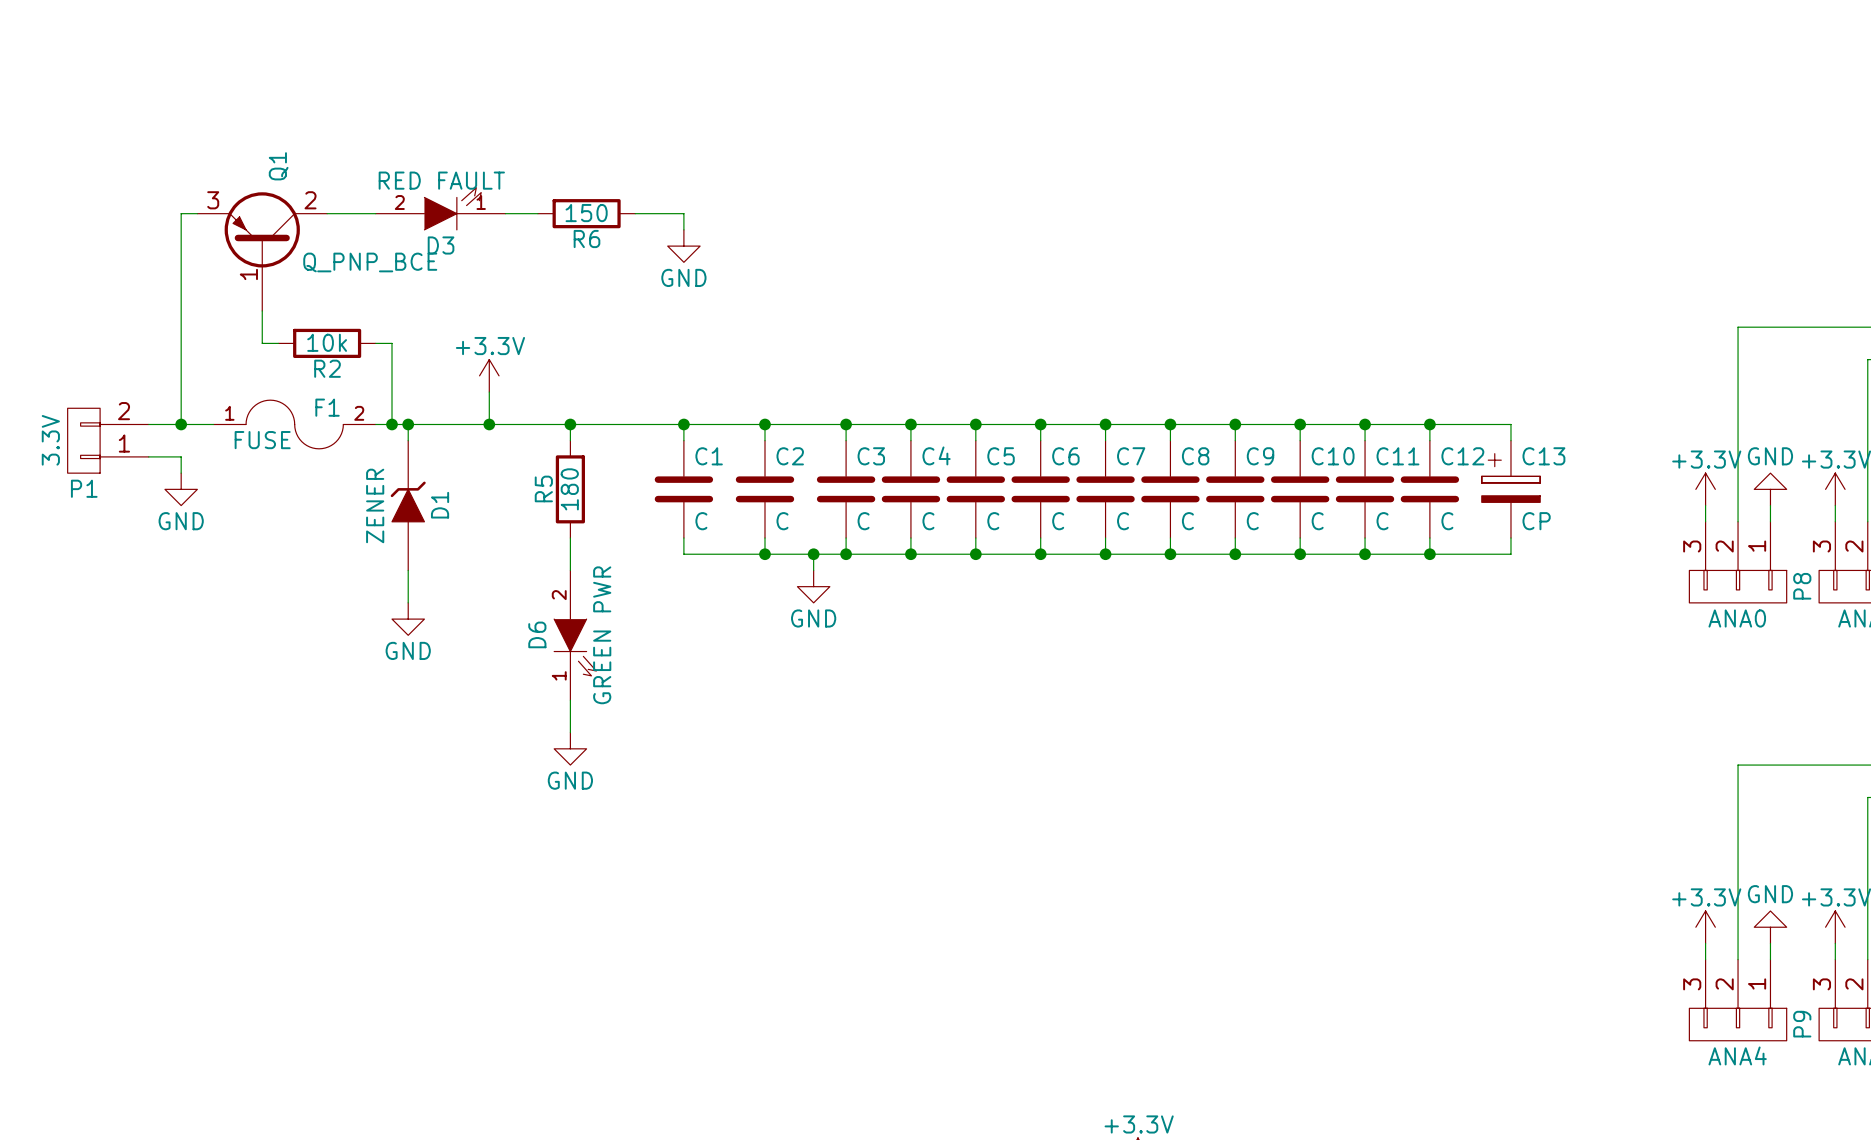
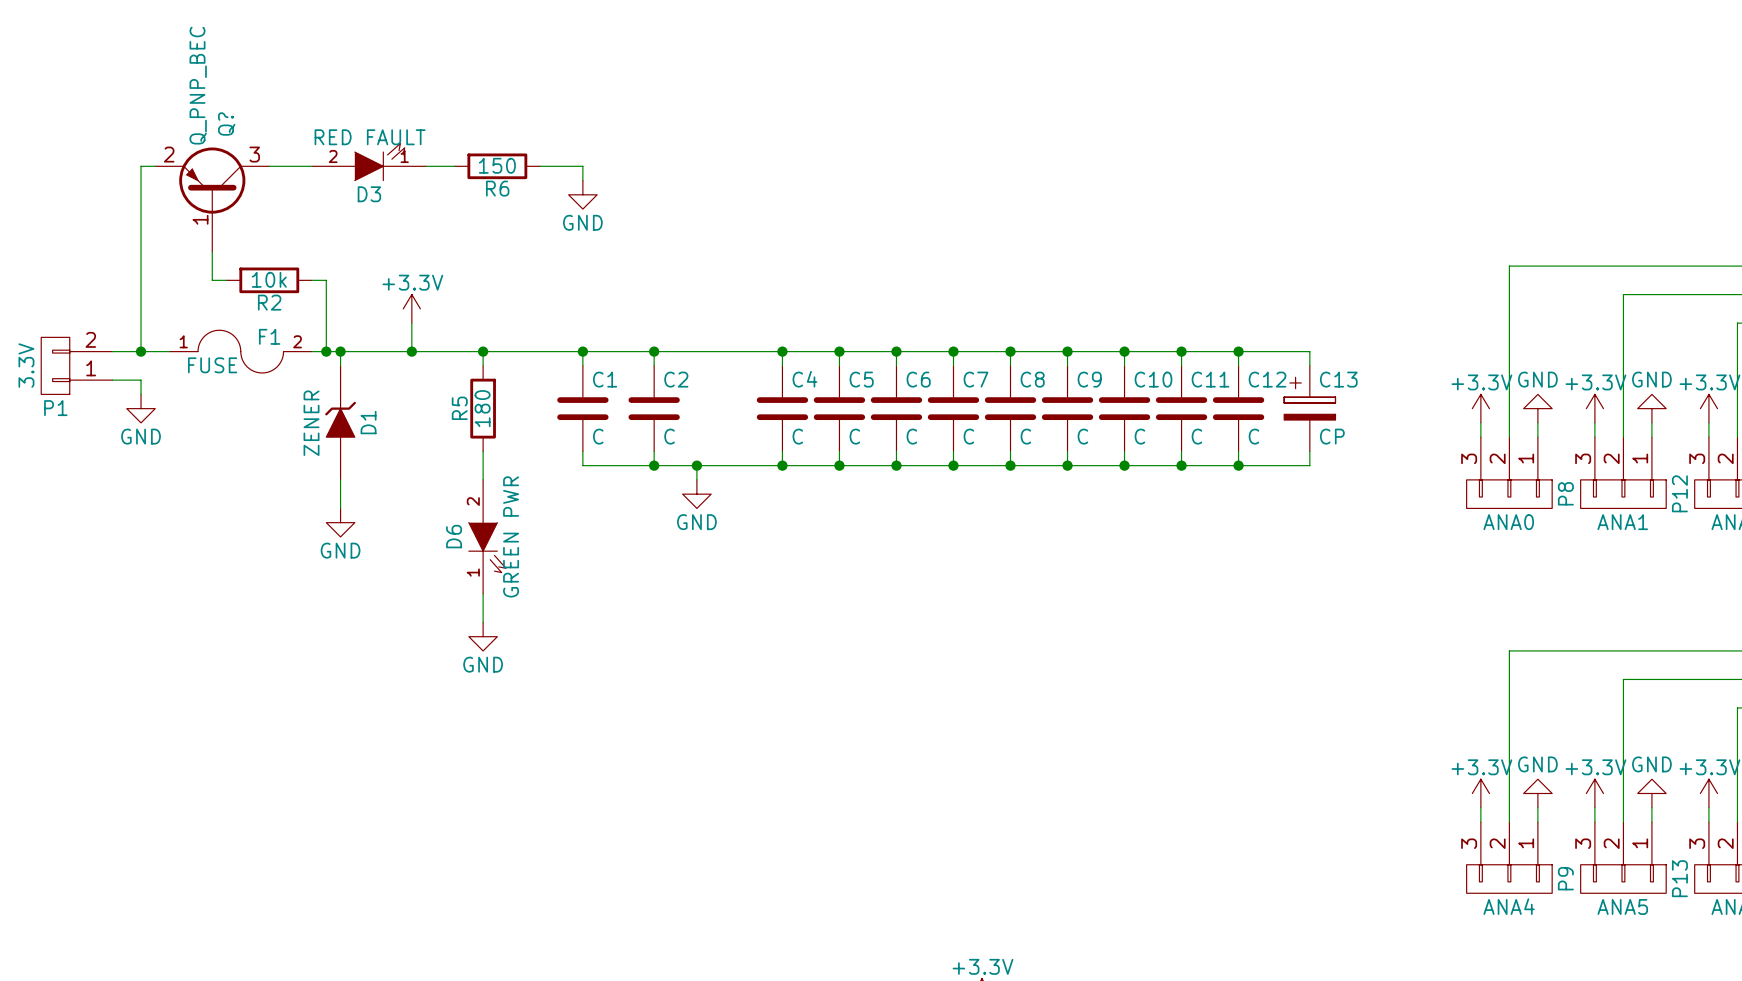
Q1 name: Q1 (278, 166) -> Q? (226, 124)
Q1 pin number: 3 (213, 200) -> 2 (169, 154)
Q1 pin number: 2 (310, 200) -> 3 (254, 154)
Q1 value: Q_PNP_BCE (370, 262) -> Q_PNP_BEC (198, 85)
wire: (846, 424) (846, 440) -> none
junction: (846, 424) -> none
C3: C (846, 489) -> none
wire: (846, 538) (846, 554) -> none
junction: (846, 554) -> none

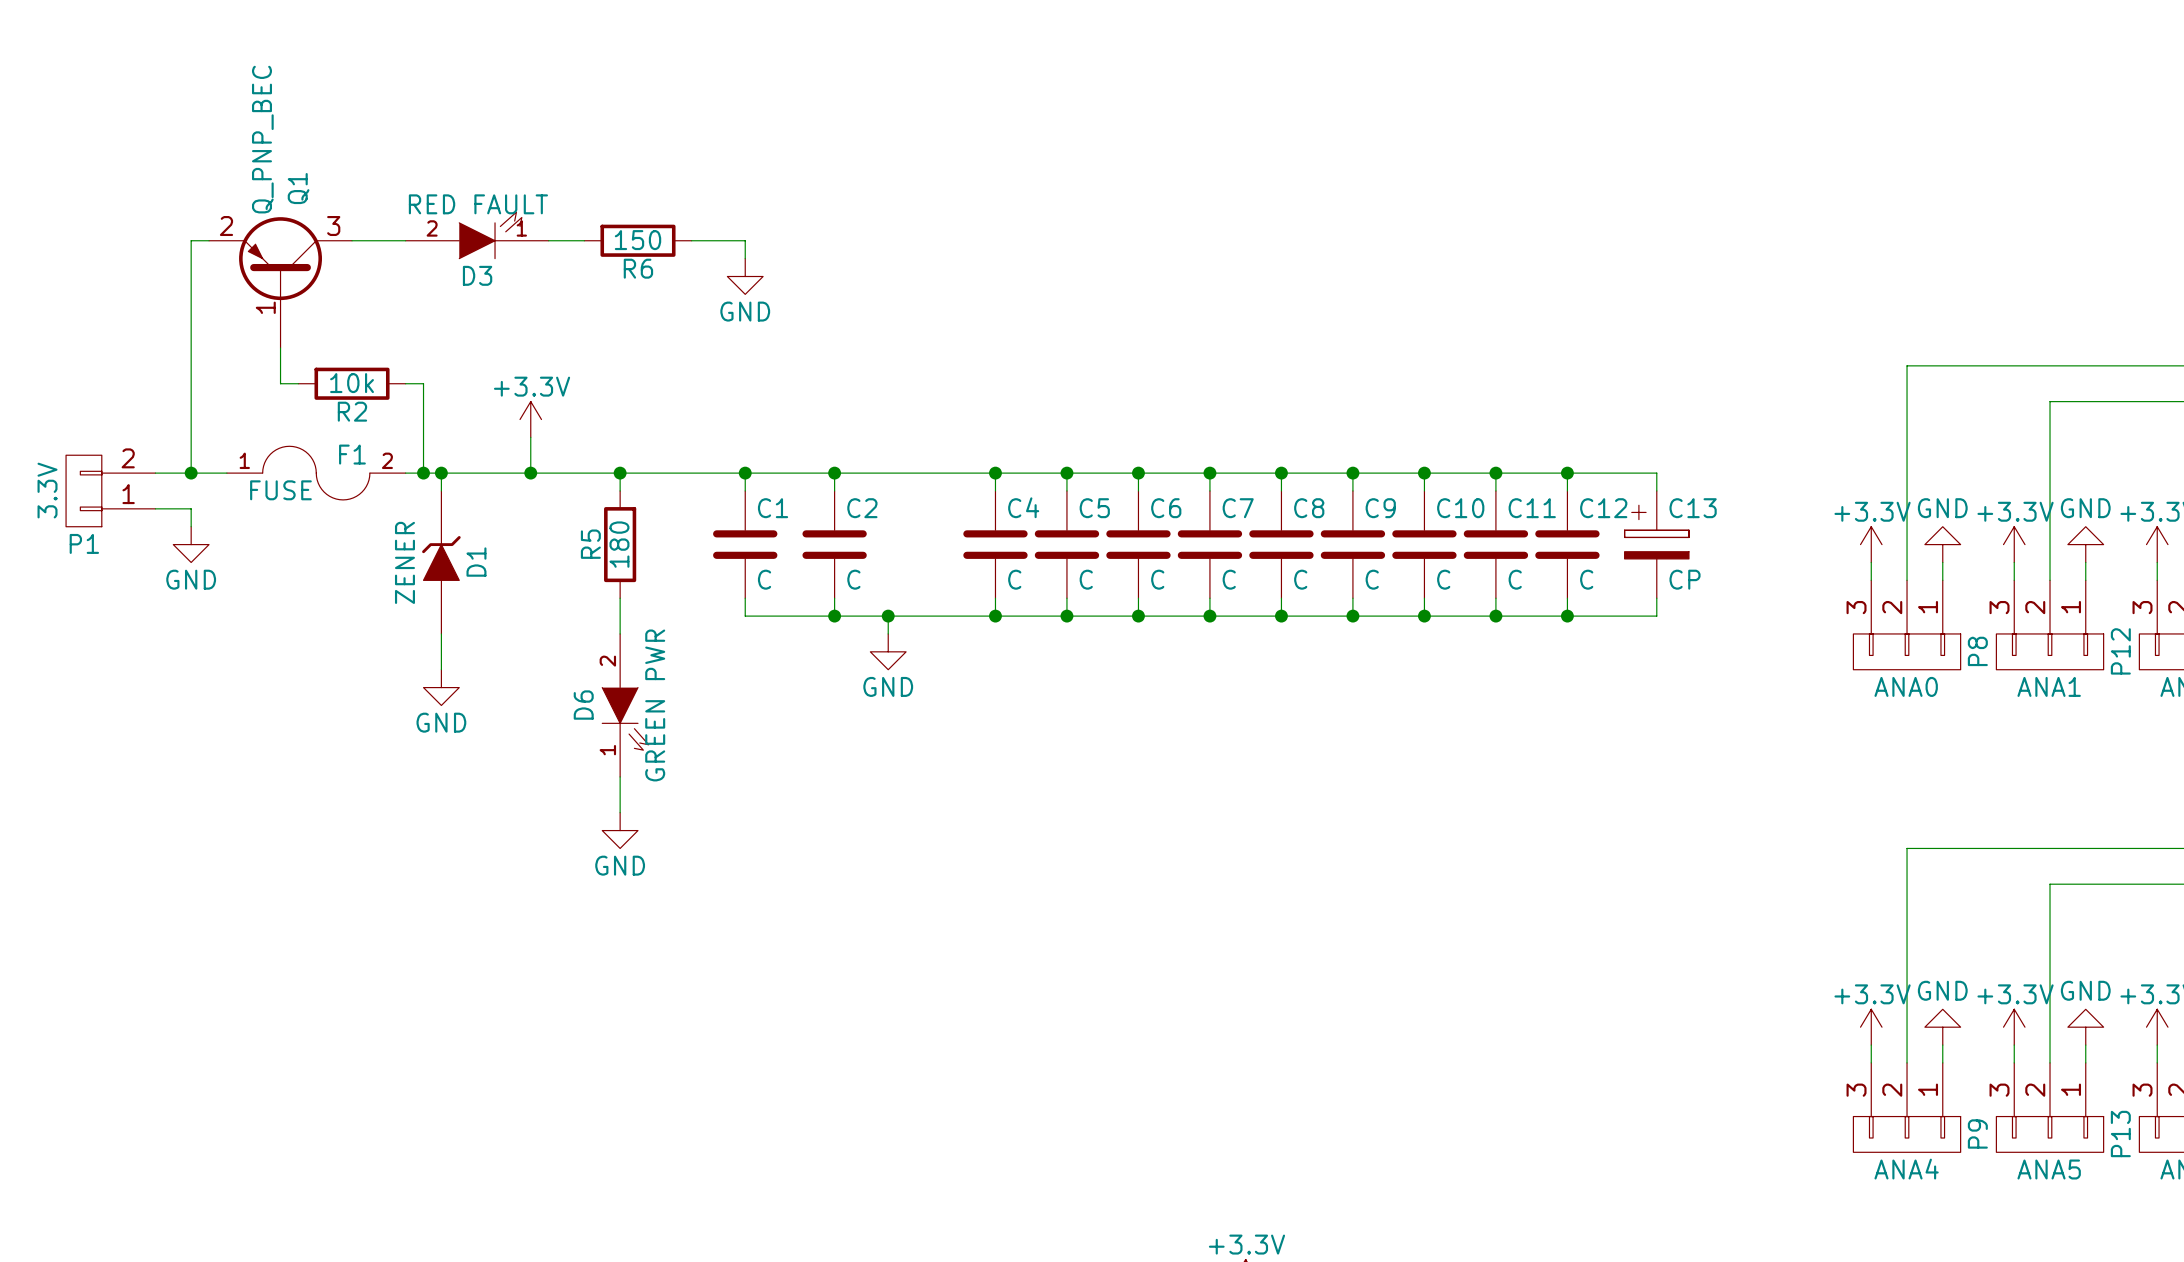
Q? name: Q? (226, 124) -> Q1 (298, 188)

